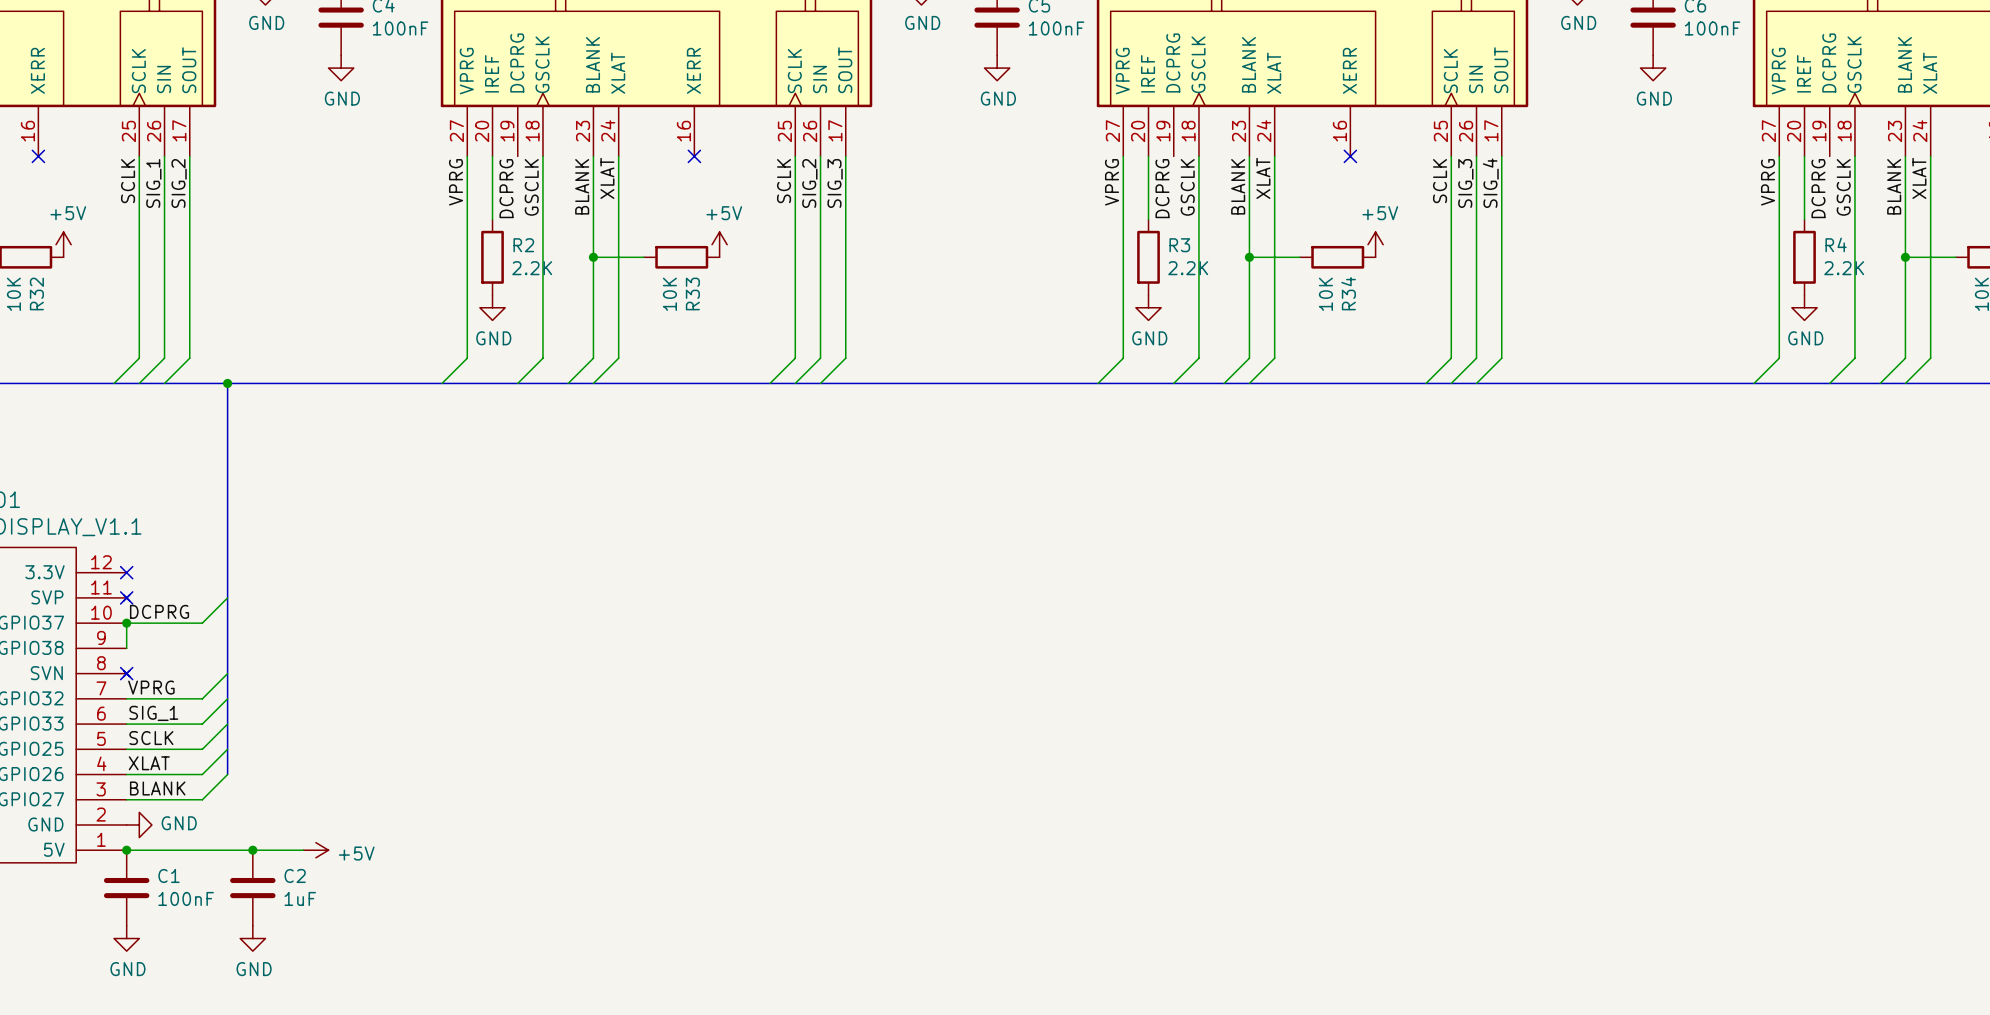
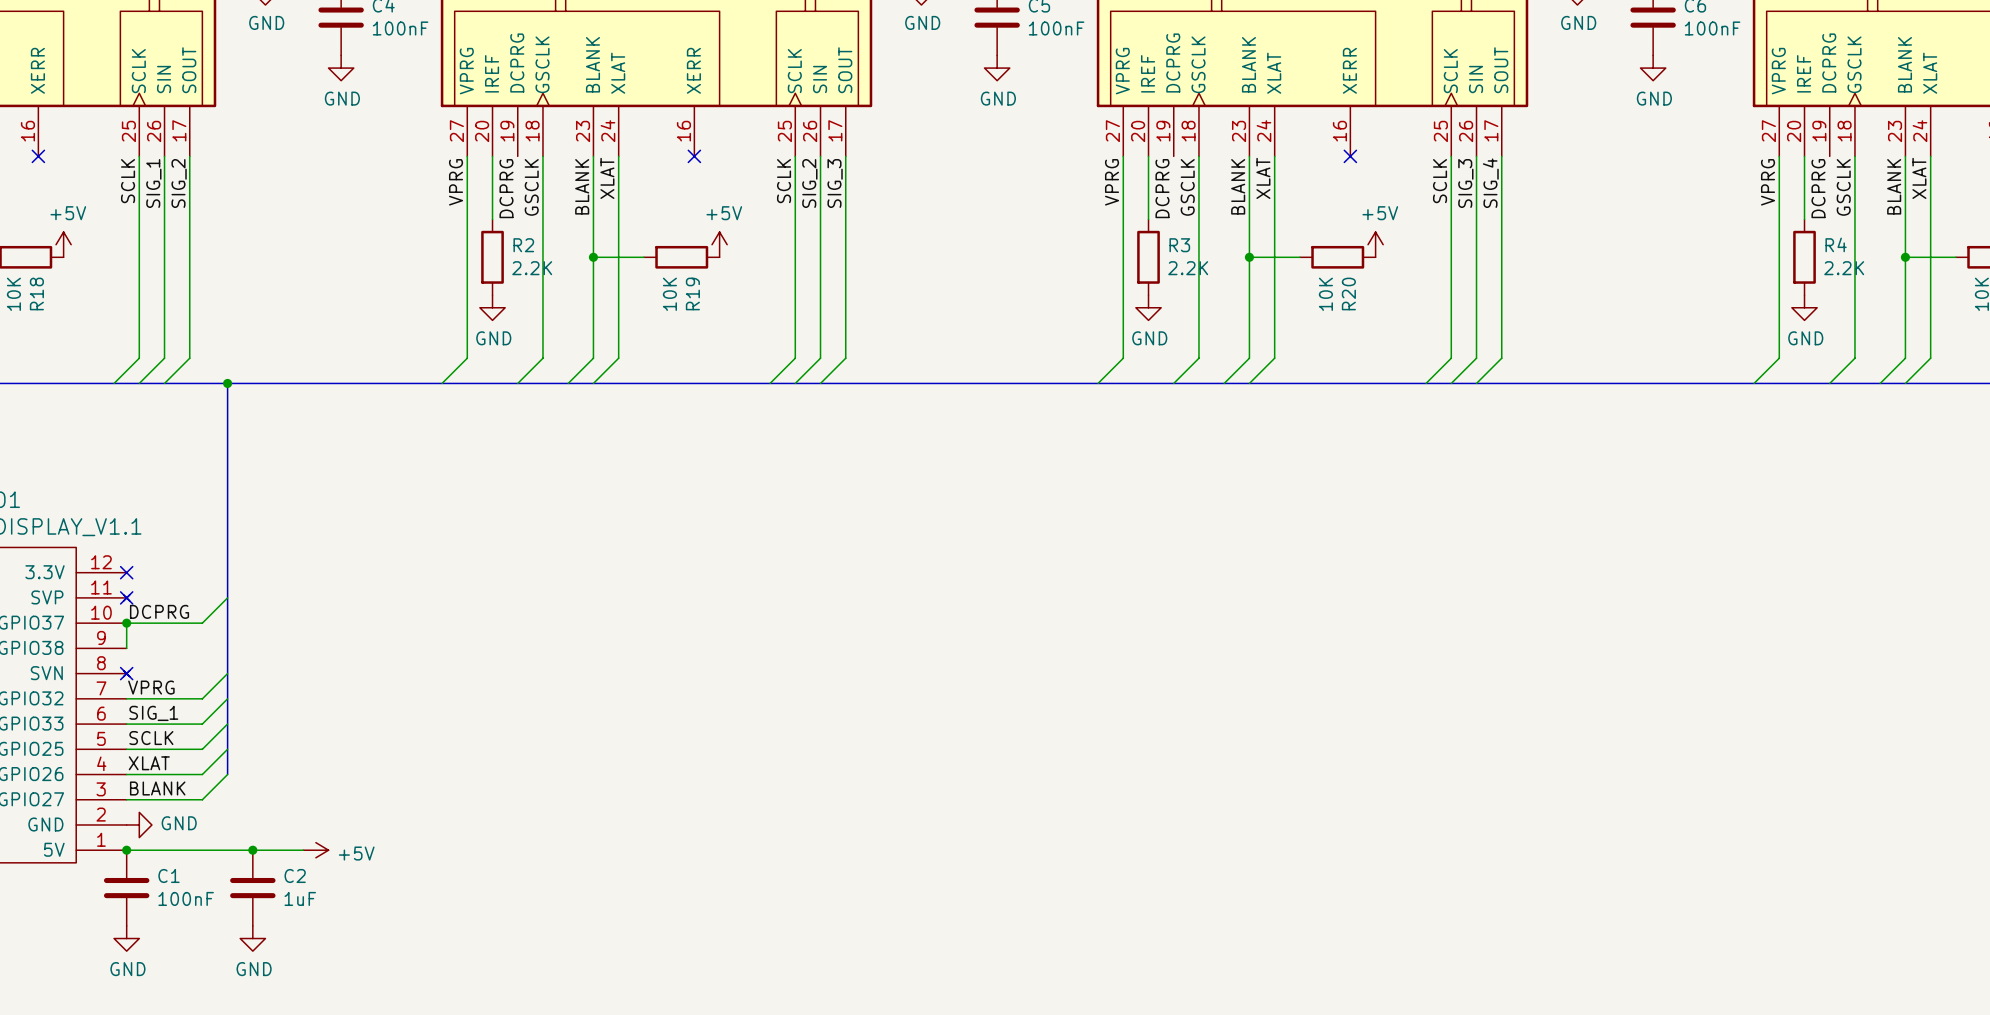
R32 name: R32 (36, 293) -> R18 (36, 293)
R33 name: R33 (692, 293) -> R19 (692, 293)
R34 name: R34 (1348, 293) -> R20 (1348, 293)

